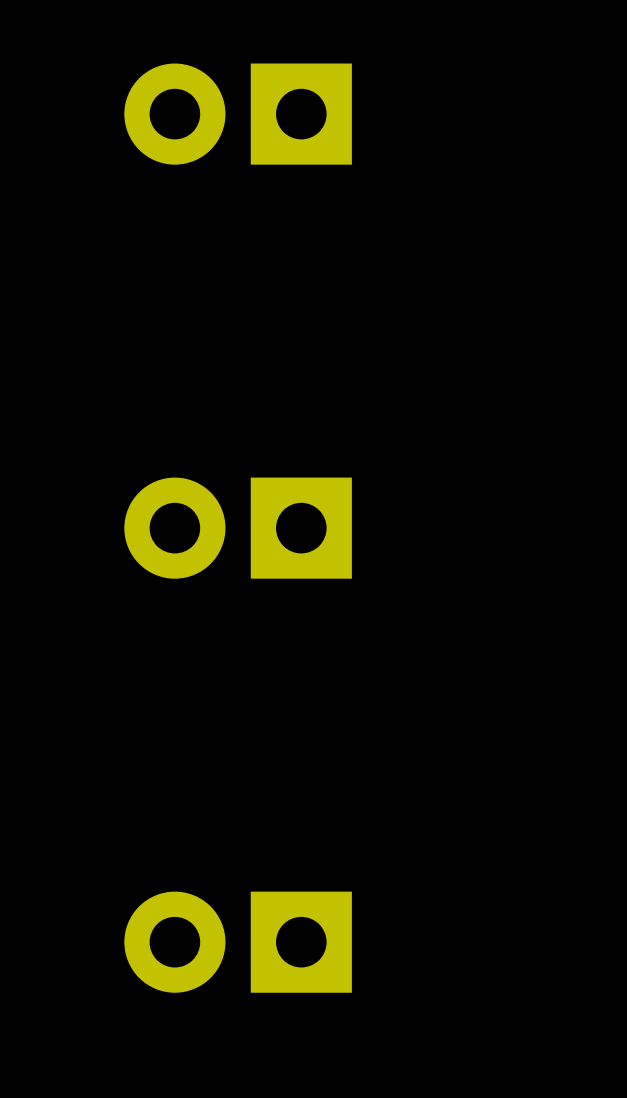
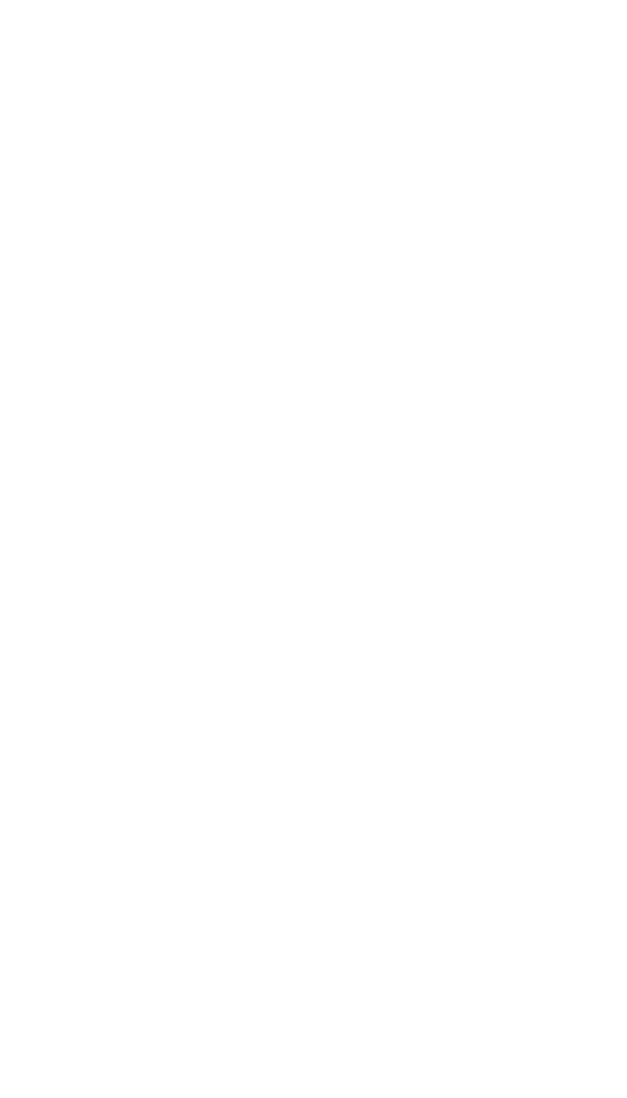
part: (238, 114) -> none
part: (238, 528) -> none
part: (238, 942) -> none

